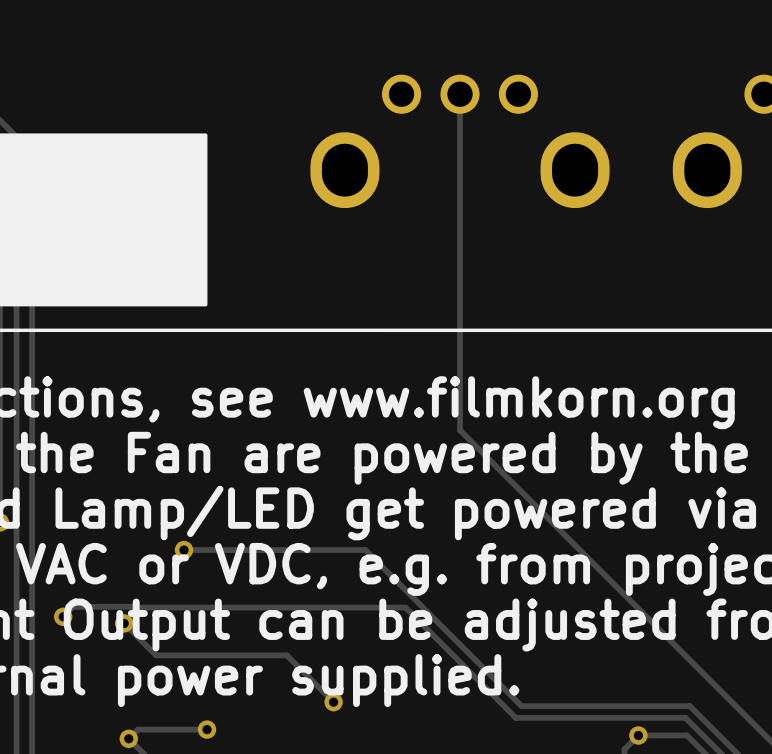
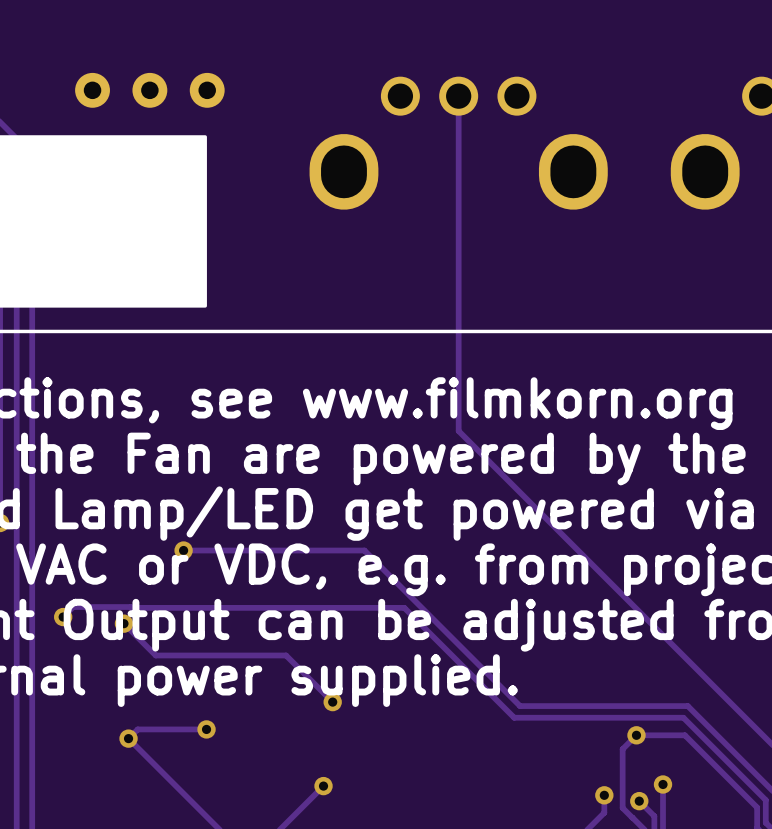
part: none -> (149, 90)

